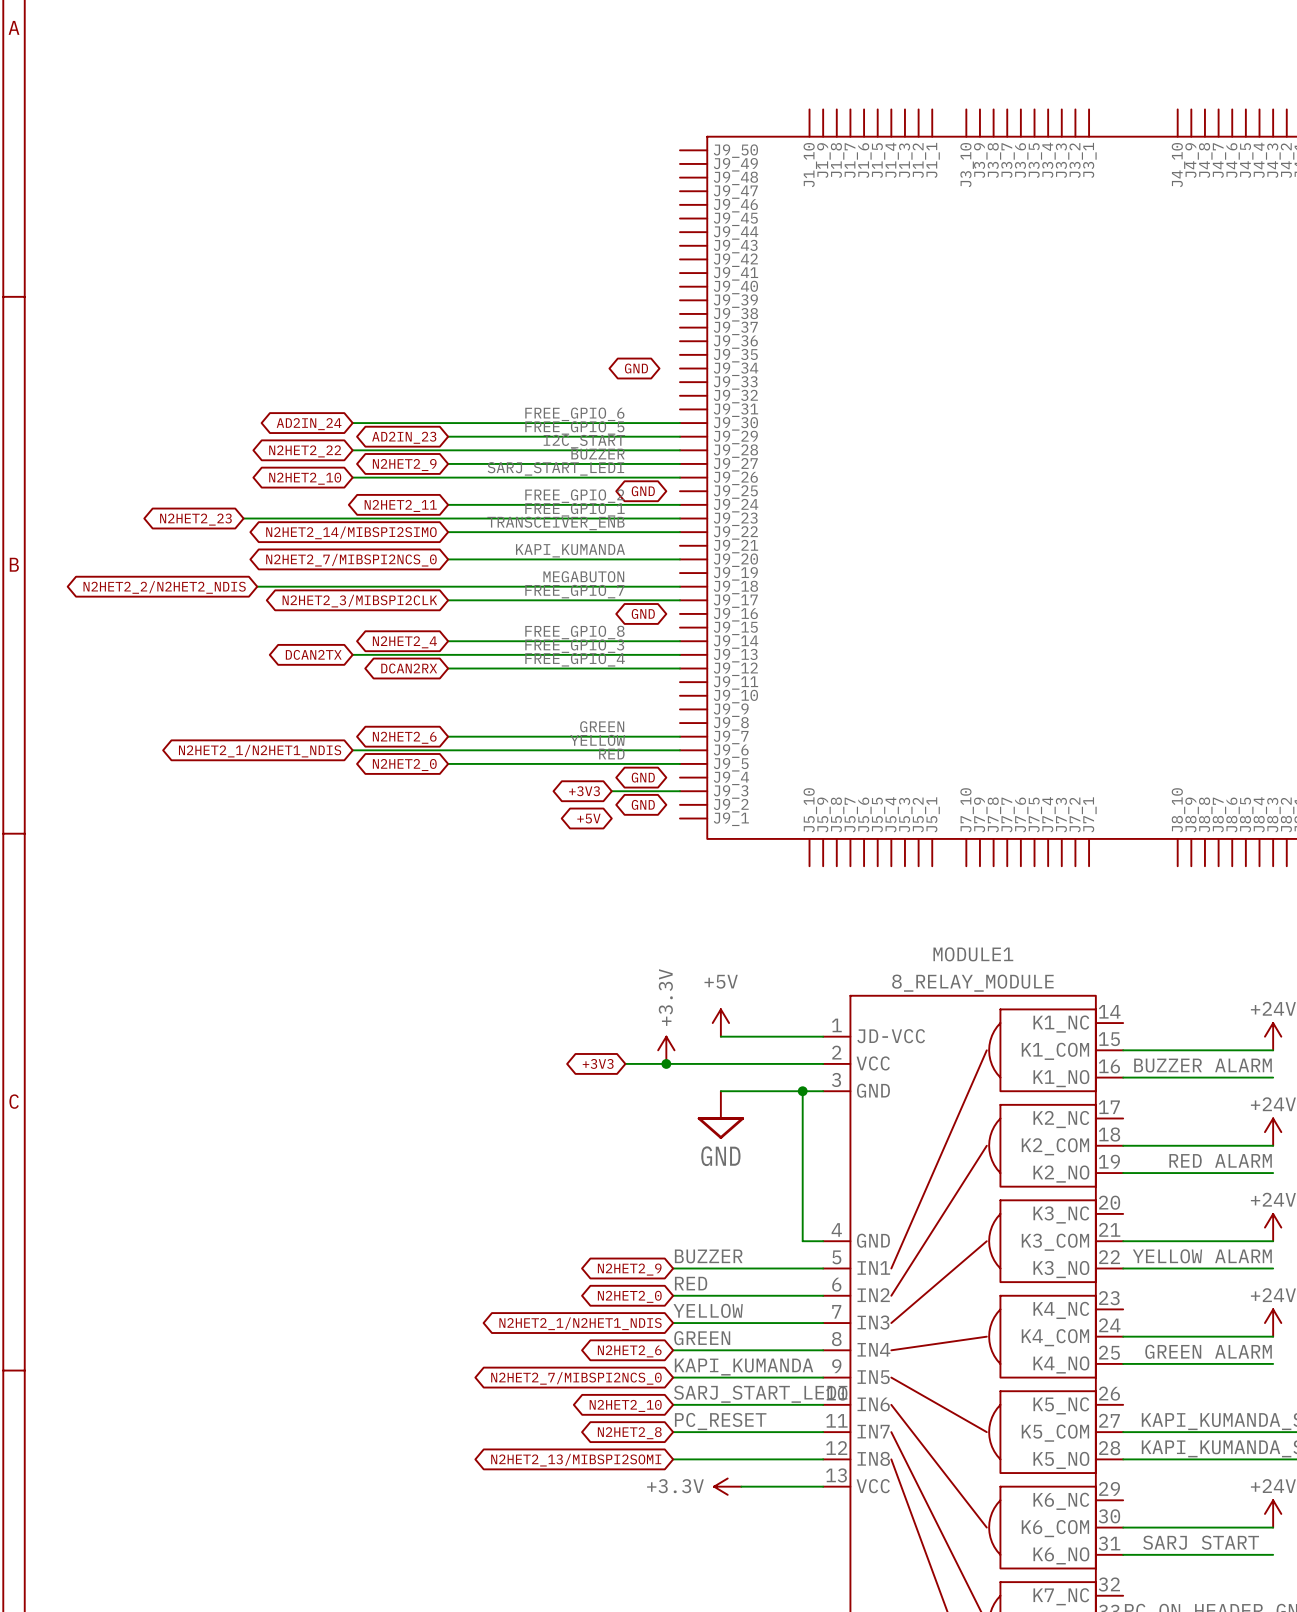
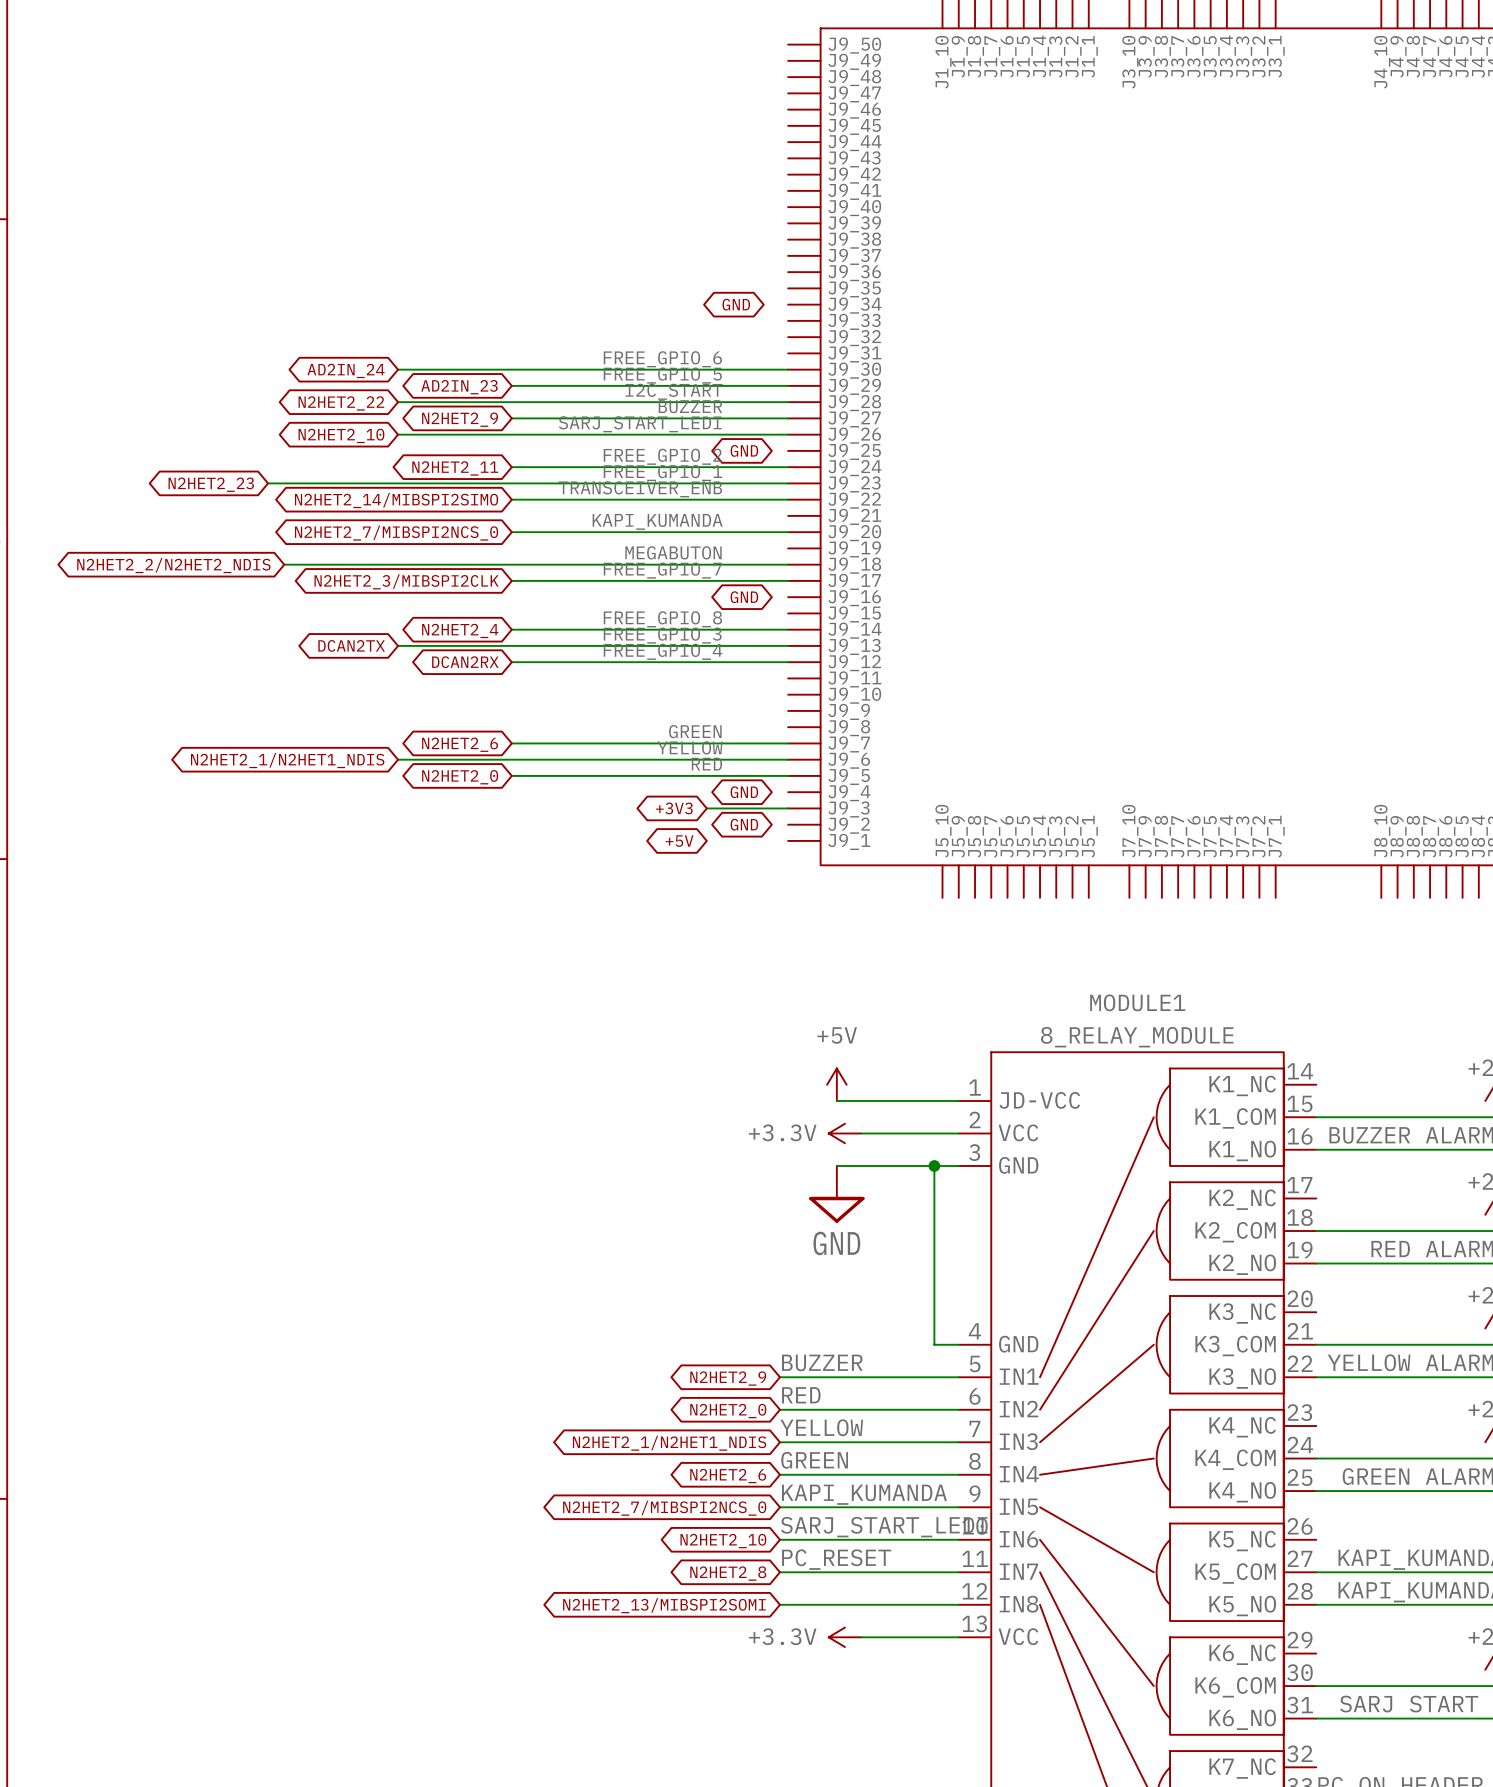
power symbol rotation: 0° (666, 1050) -> 90° counterclockwise (844, 1133)
power symbol position: +3.3V (666, 1050) -> +3.3V (844, 1133)
global label: +3V3 (598, 1063) -> none
wire: (625, 1063) (741, 1063) -> none
junction: (666, 1063) -> none

